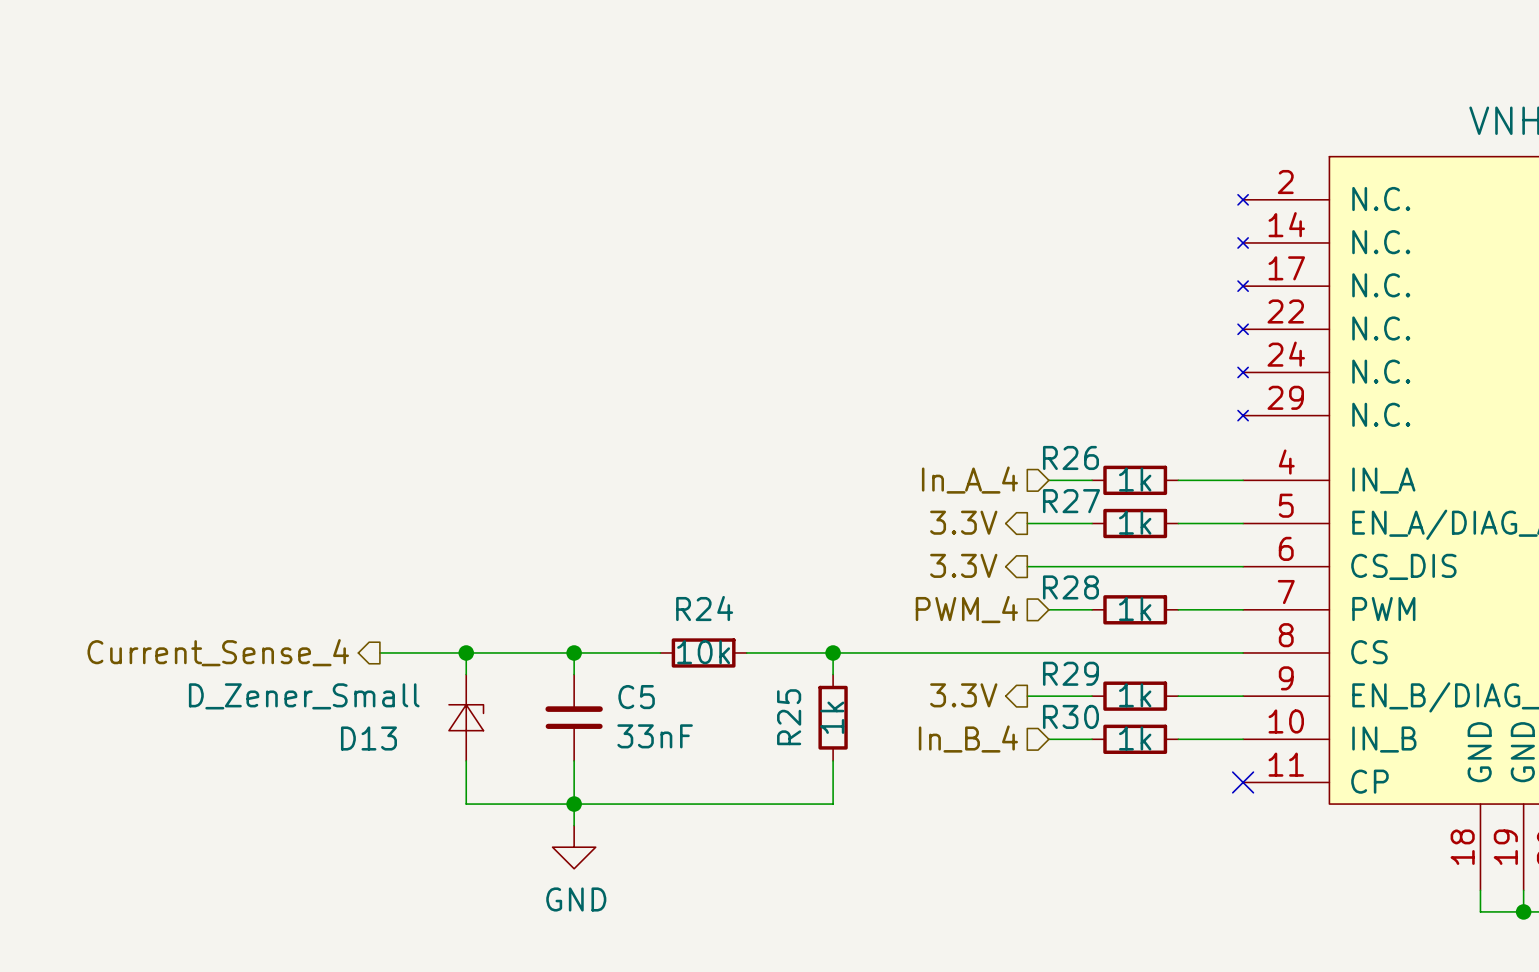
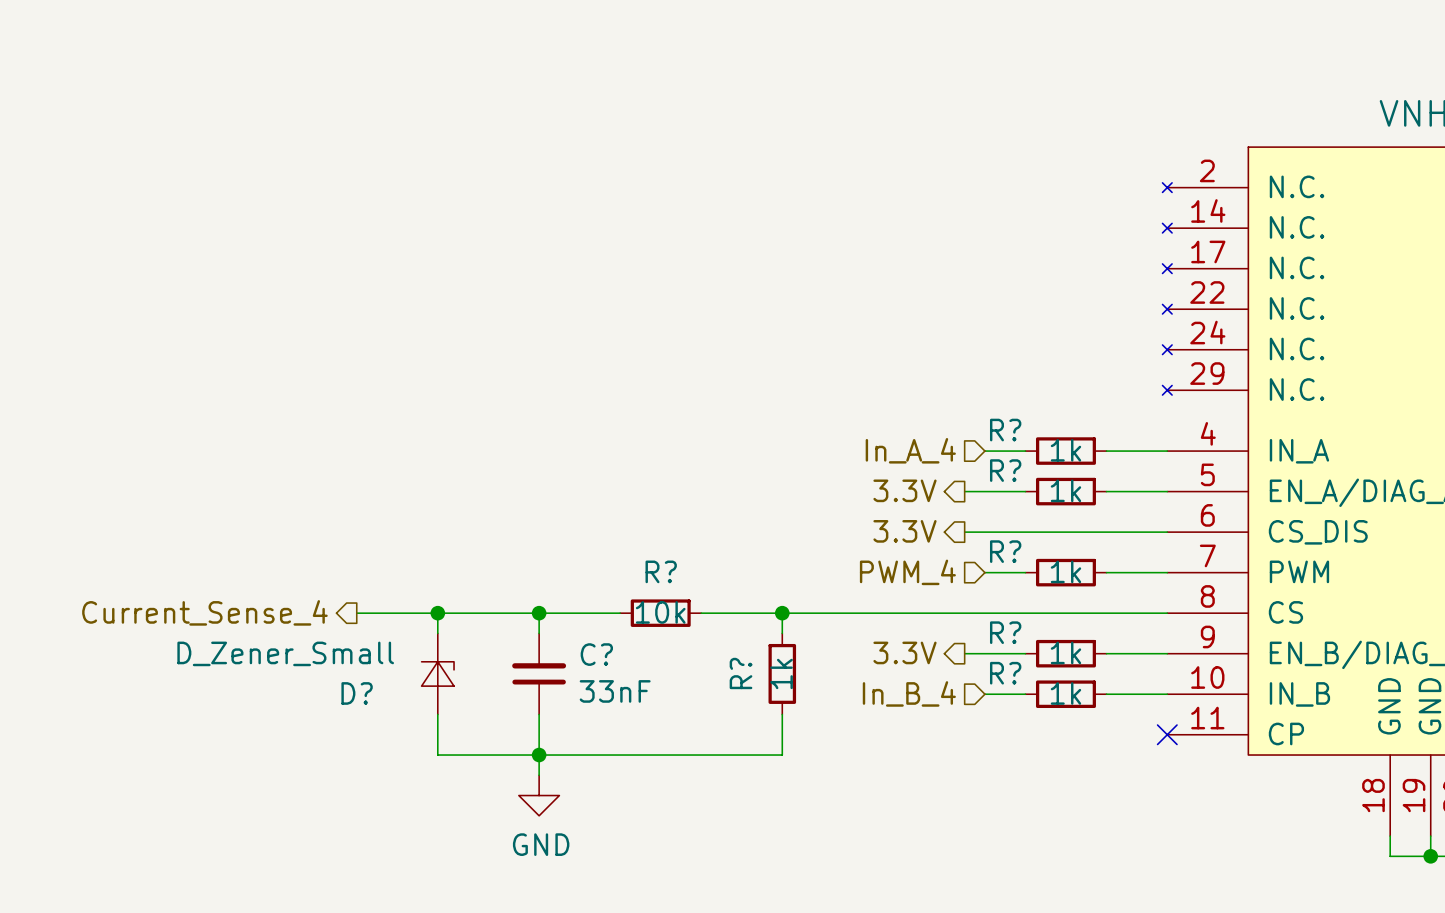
R26 name: R26 (1070, 457) -> R? (1005, 430)
R27 name: R27 (1071, 501) -> R? (1005, 470)
R28 name: R28 (1070, 587) -> R? (1005, 551)
R24 name: R24 (704, 608) -> R? (661, 571)
R29 name: R29 (1070, 673) -> R? (1005, 632)
C5 name: C5 (636, 697) -> C? (596, 654)
R30 name: R30 (1070, 716) -> R? (1005, 673)
R25 name: R25 (789, 717) -> R? (741, 673)
D13 name: D13 (368, 738) -> D? (357, 693)

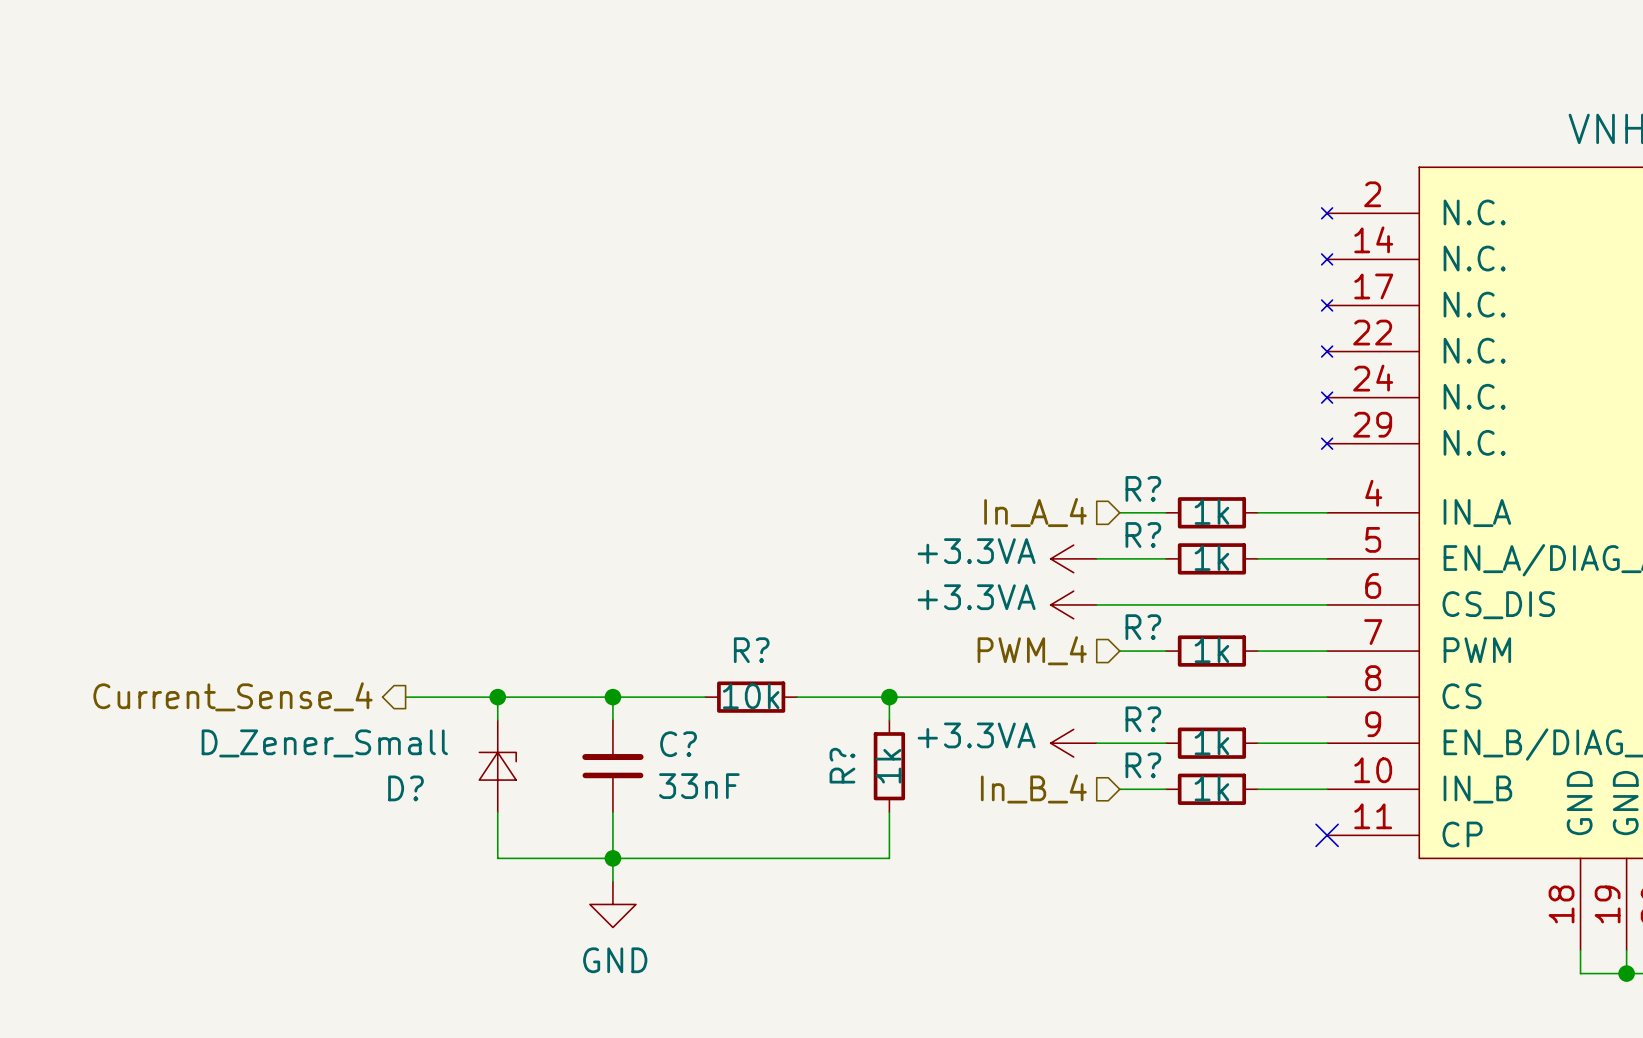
hierarchical label: 3.3V (905, 490) -> none
power symbol: none -> +3.3VA (1073, 558)
hierarchical label: 3.3V (905, 531) -> none
power symbol: none -> +3.3VA (1073, 604)
hierarchical label: 3.3V (905, 652) -> none
power symbol: none -> +3.3VA (1073, 743)

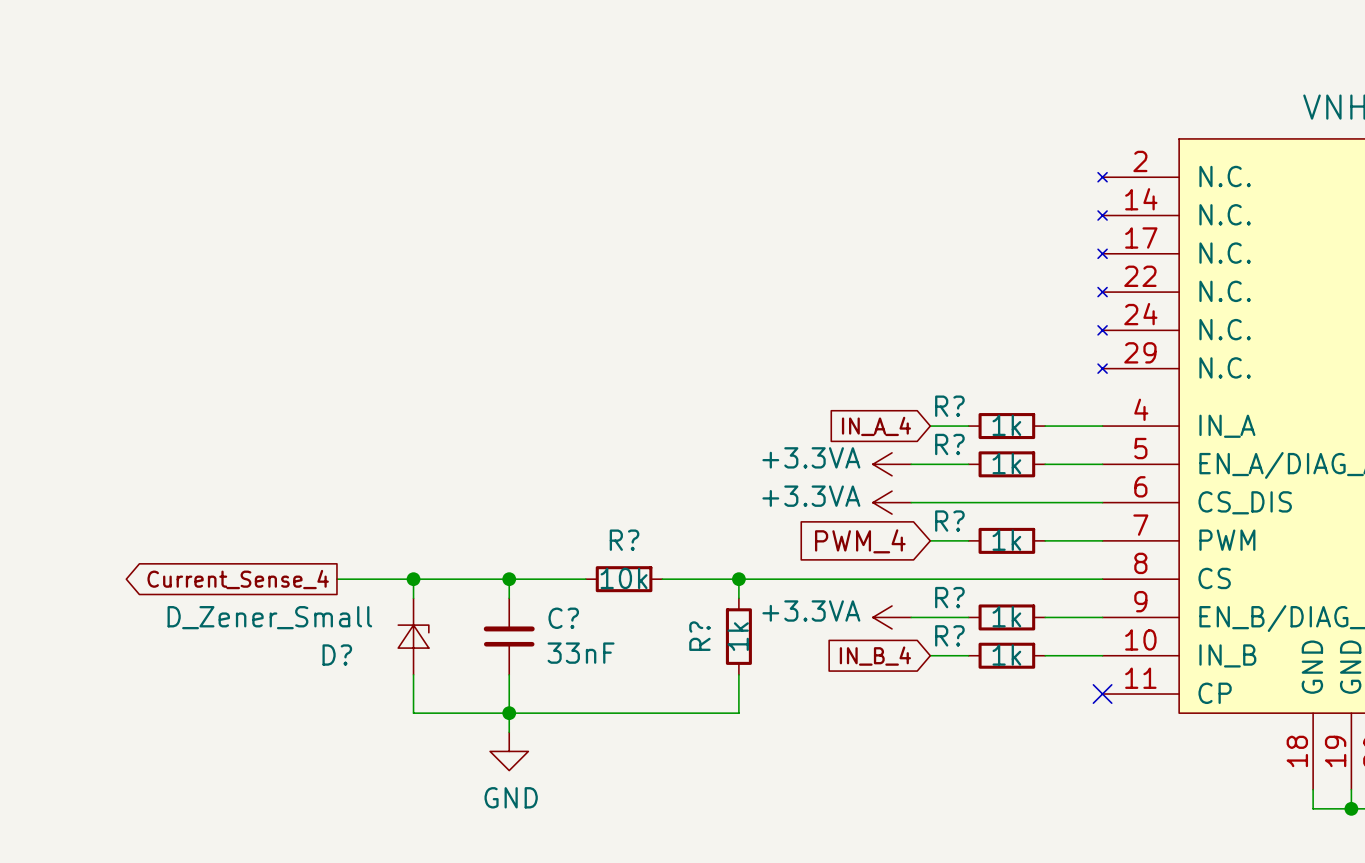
hierarchical label: In_A_4 (1035, 512) -> none
global label: none -> IN_A_4 (876, 426)
hierarchical label: PWM_4 (1032, 650) -> none
global label: none -> PWM_4 (860, 541)
hierarchical label: Current_Sense_4 (233, 696) -> none
global label: none -> Current_Sense_4 (238, 579)
hierarchical label: In_B_4 (1033, 788) -> none
global label: none -> IN_B_4 (875, 656)

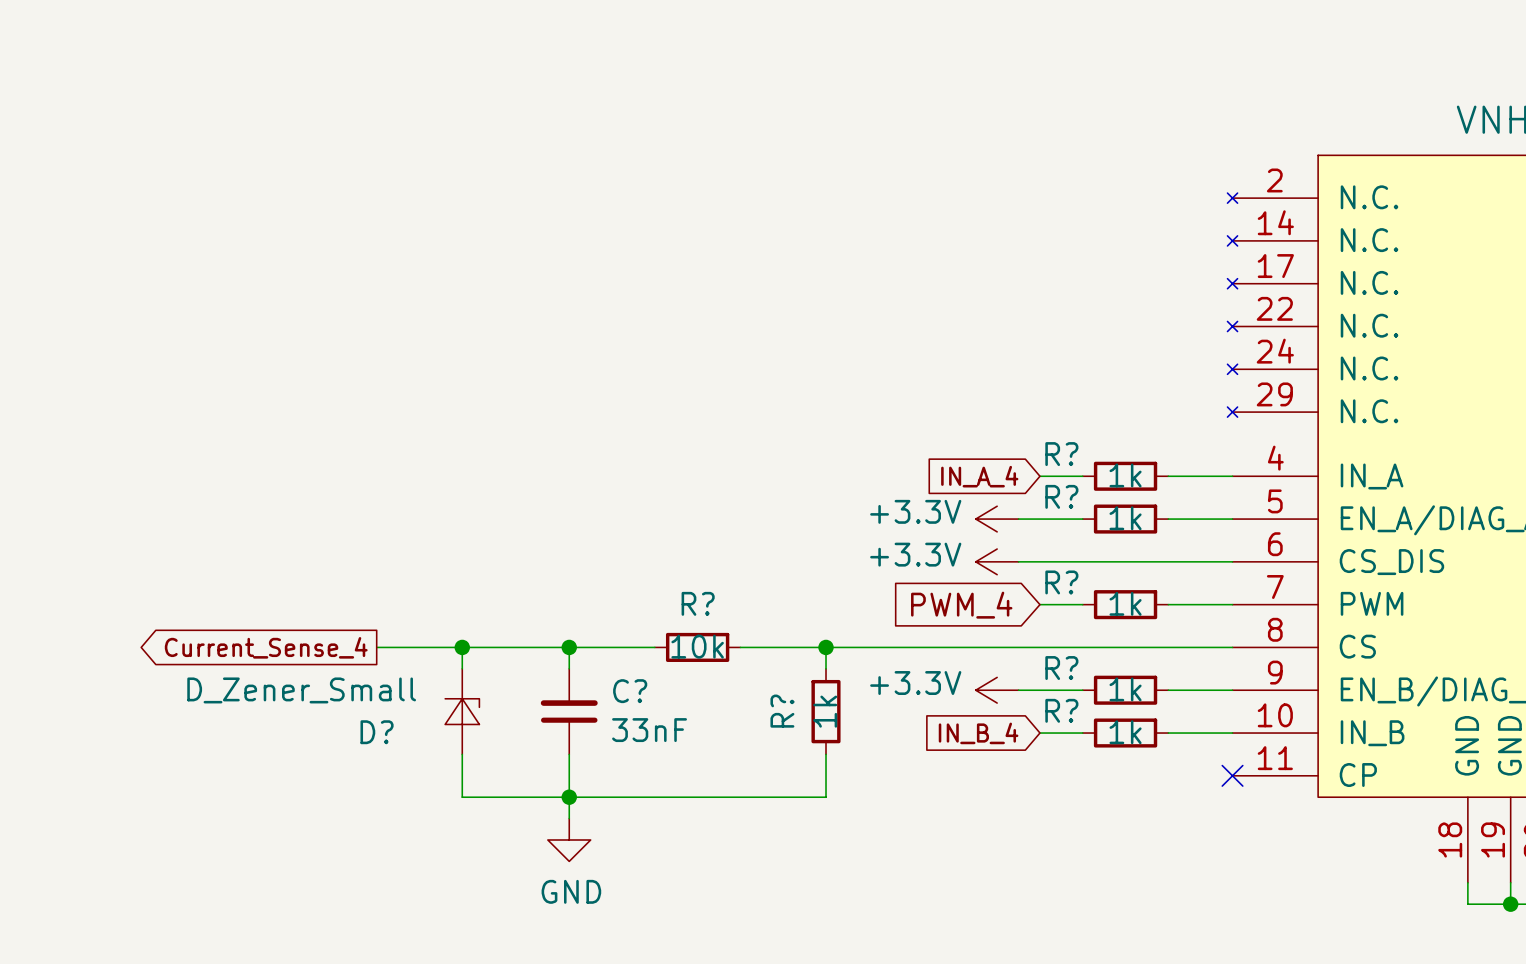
power symbol: +3.3VA (892, 464) -> +3.3V (997, 519)
power symbol: +3.3VA (892, 502) -> +3.3V (997, 561)
power symbol: +3.3VA (892, 617) -> +3.3V (997, 690)

